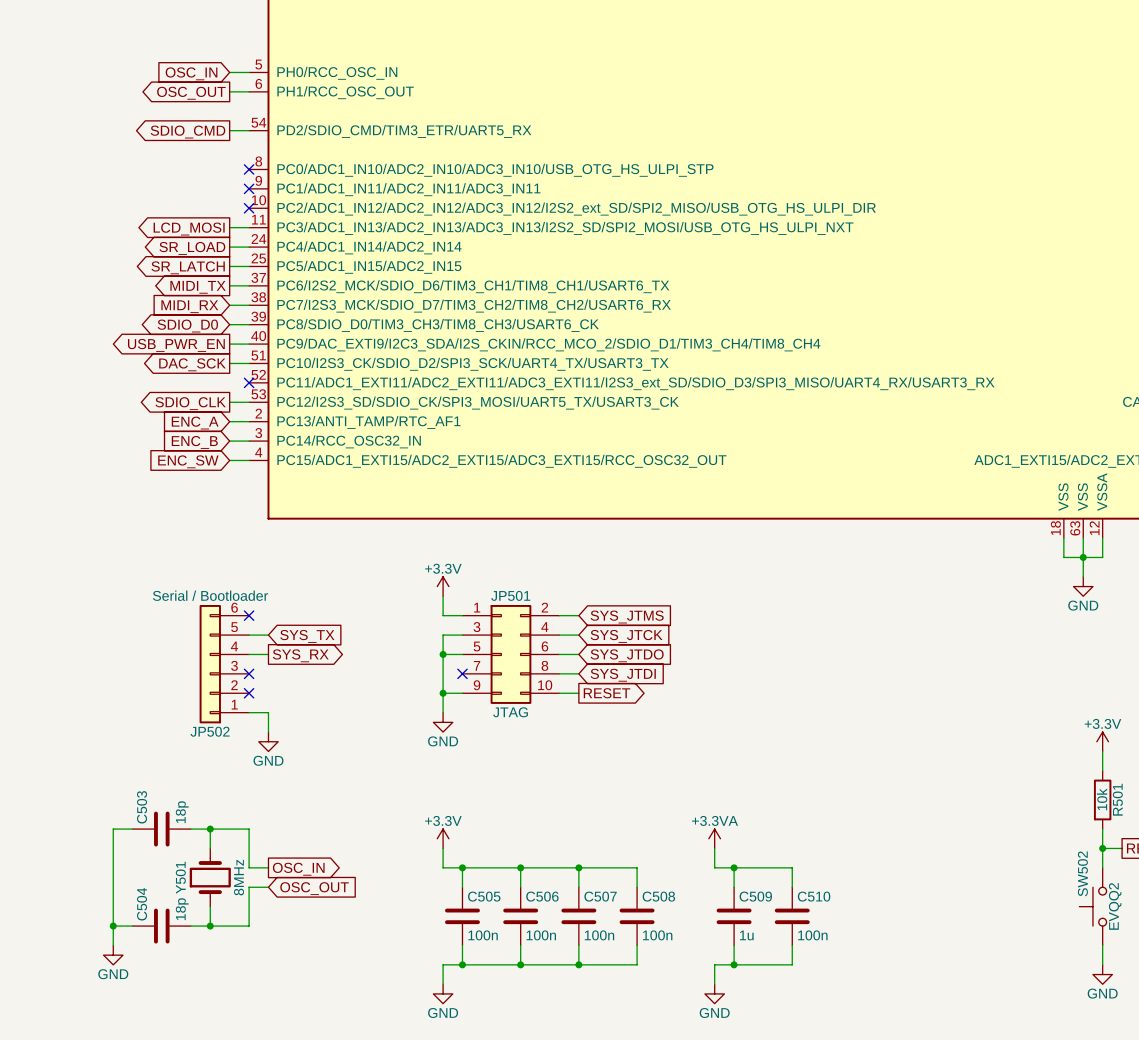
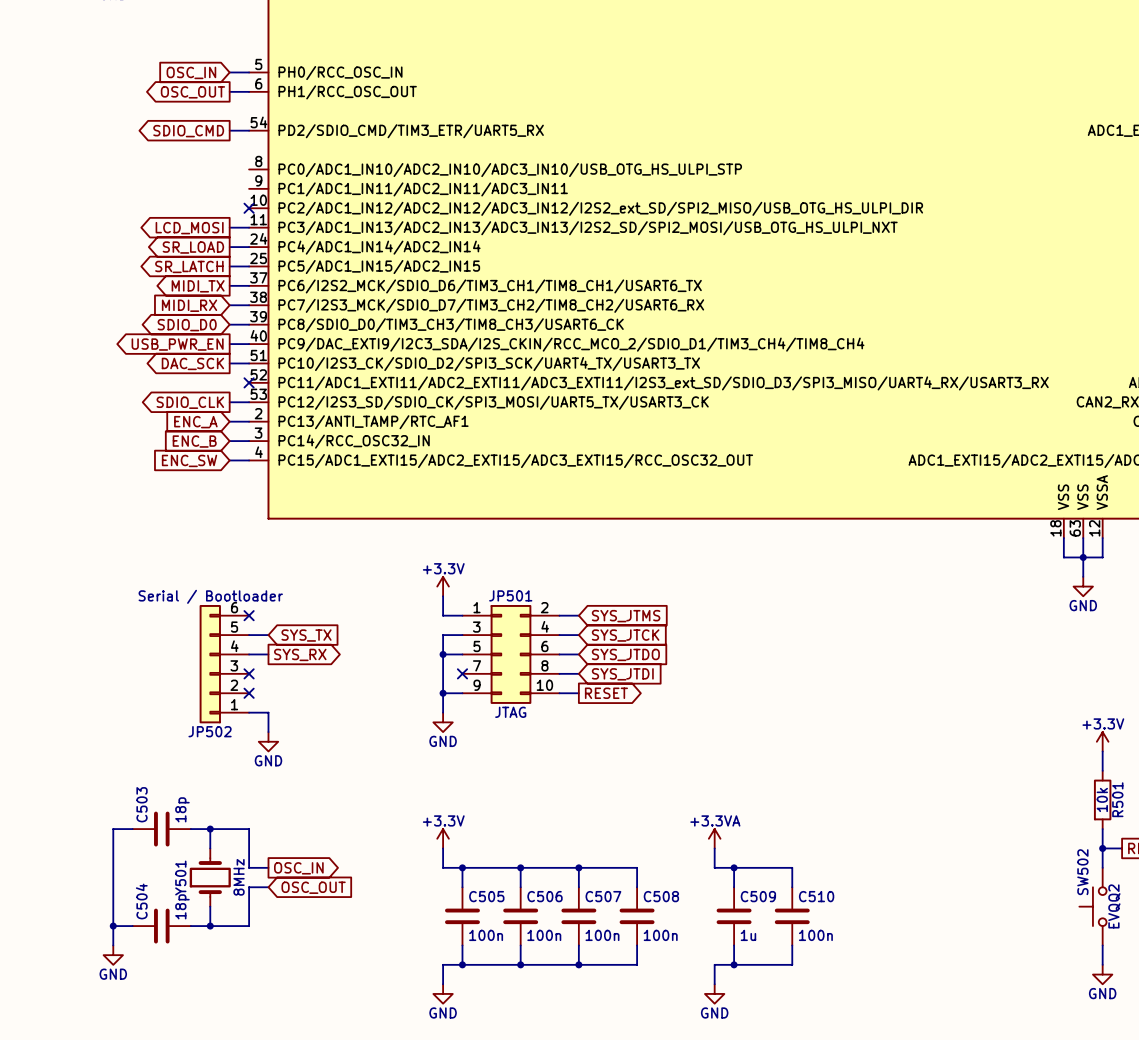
no-connect mark: (249, 169) -> none
no-connect mark: (249, 188) -> none

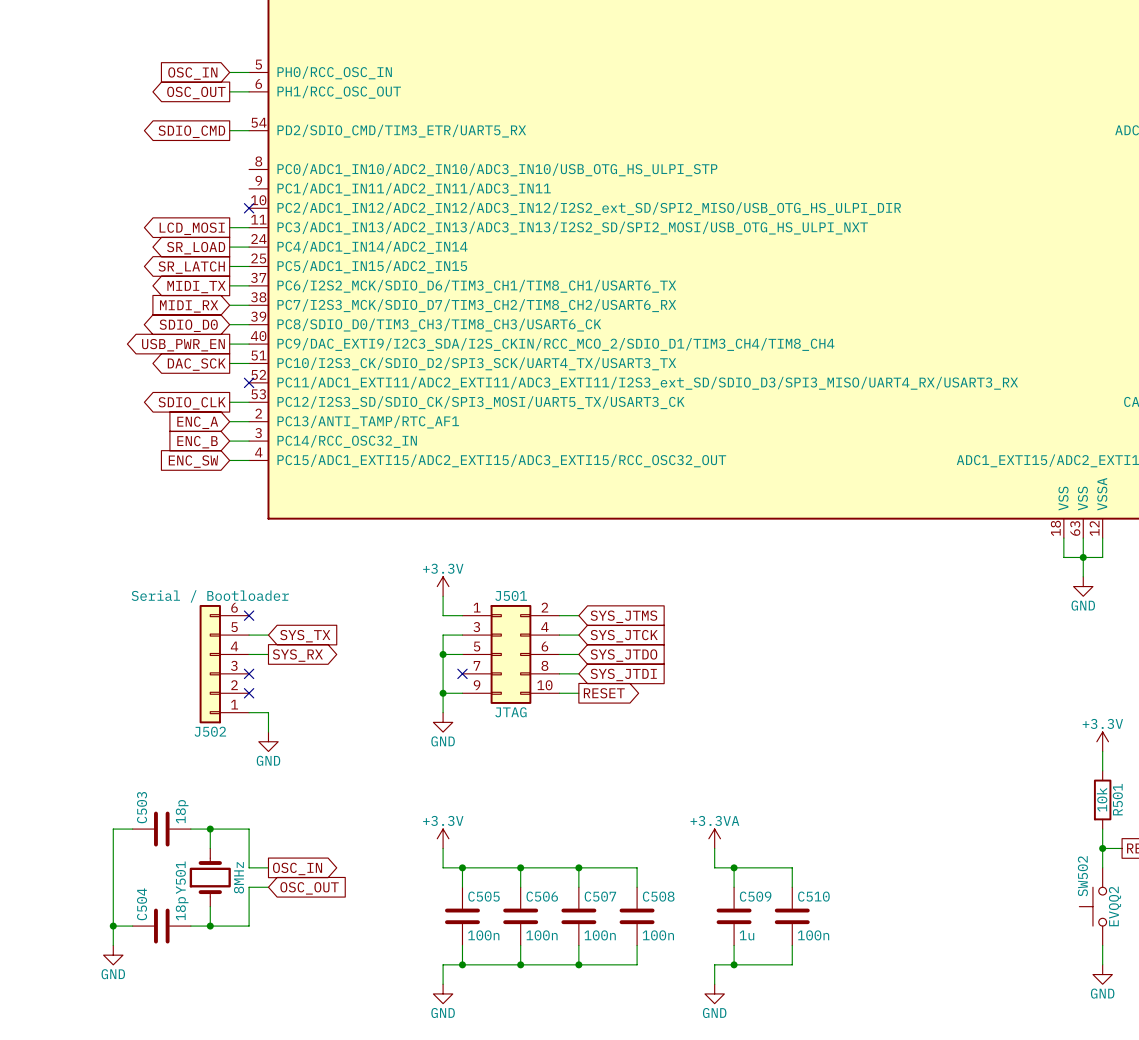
JP501 name: JP501 (510, 595) -> J501 (511, 595)
JP502 name: JP502 (210, 731) -> J502 (210, 731)

